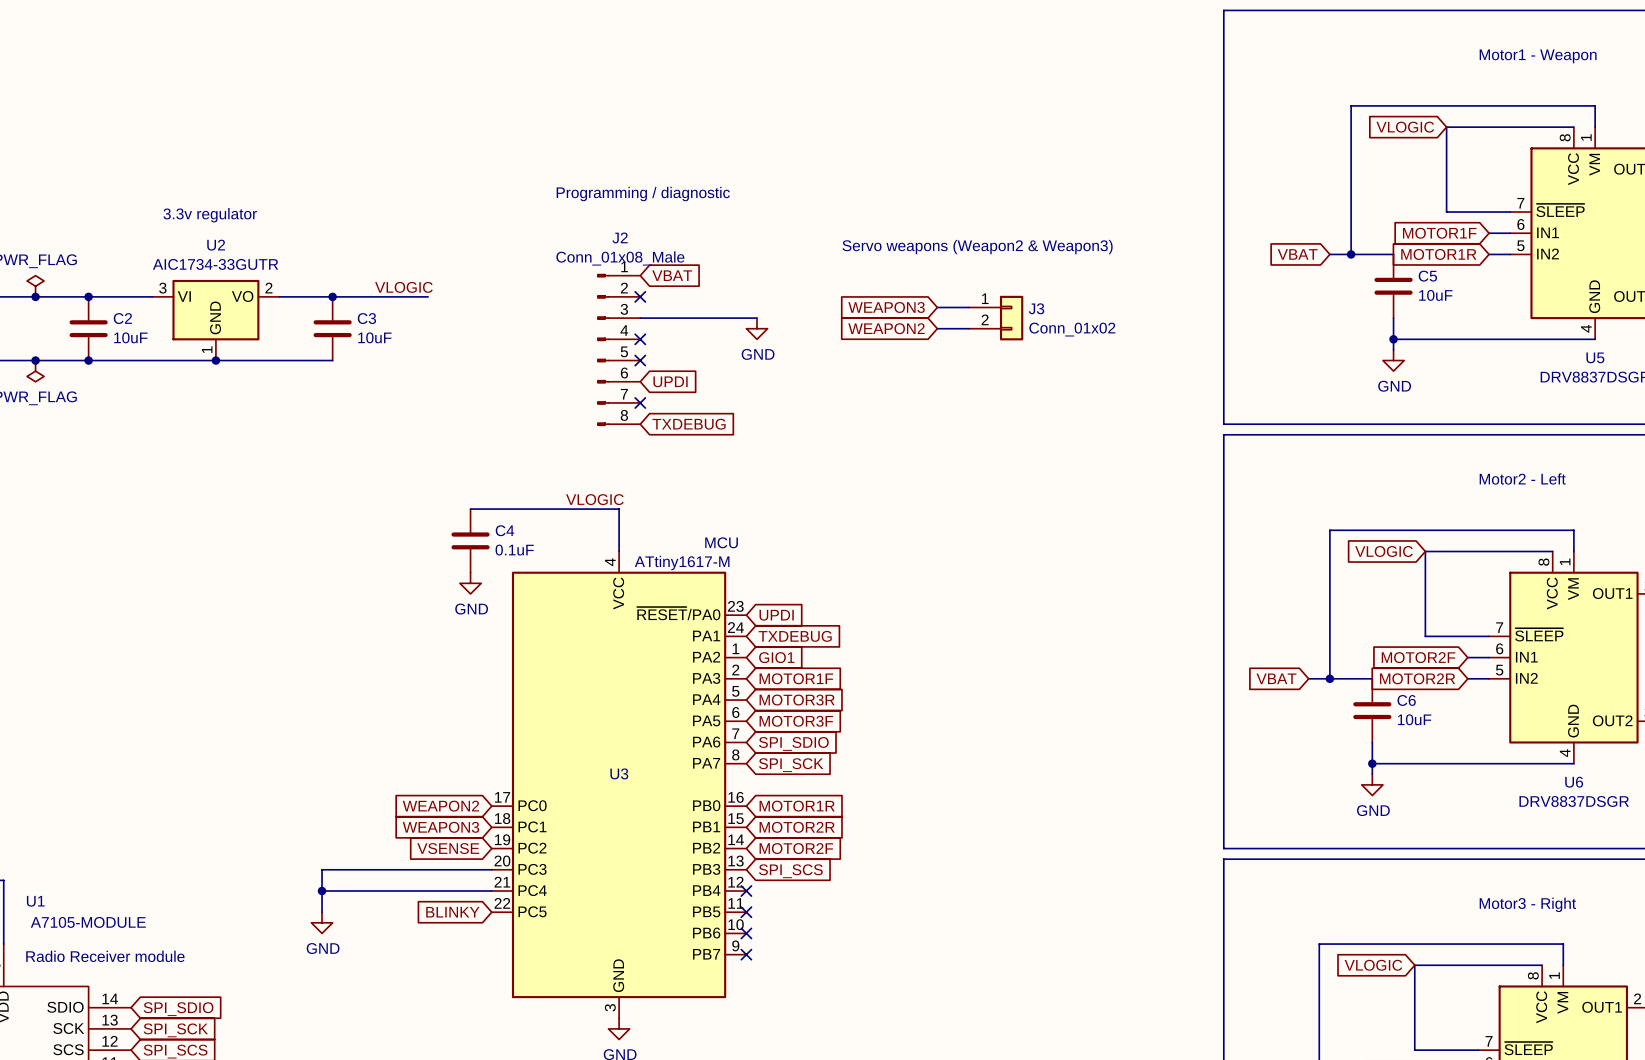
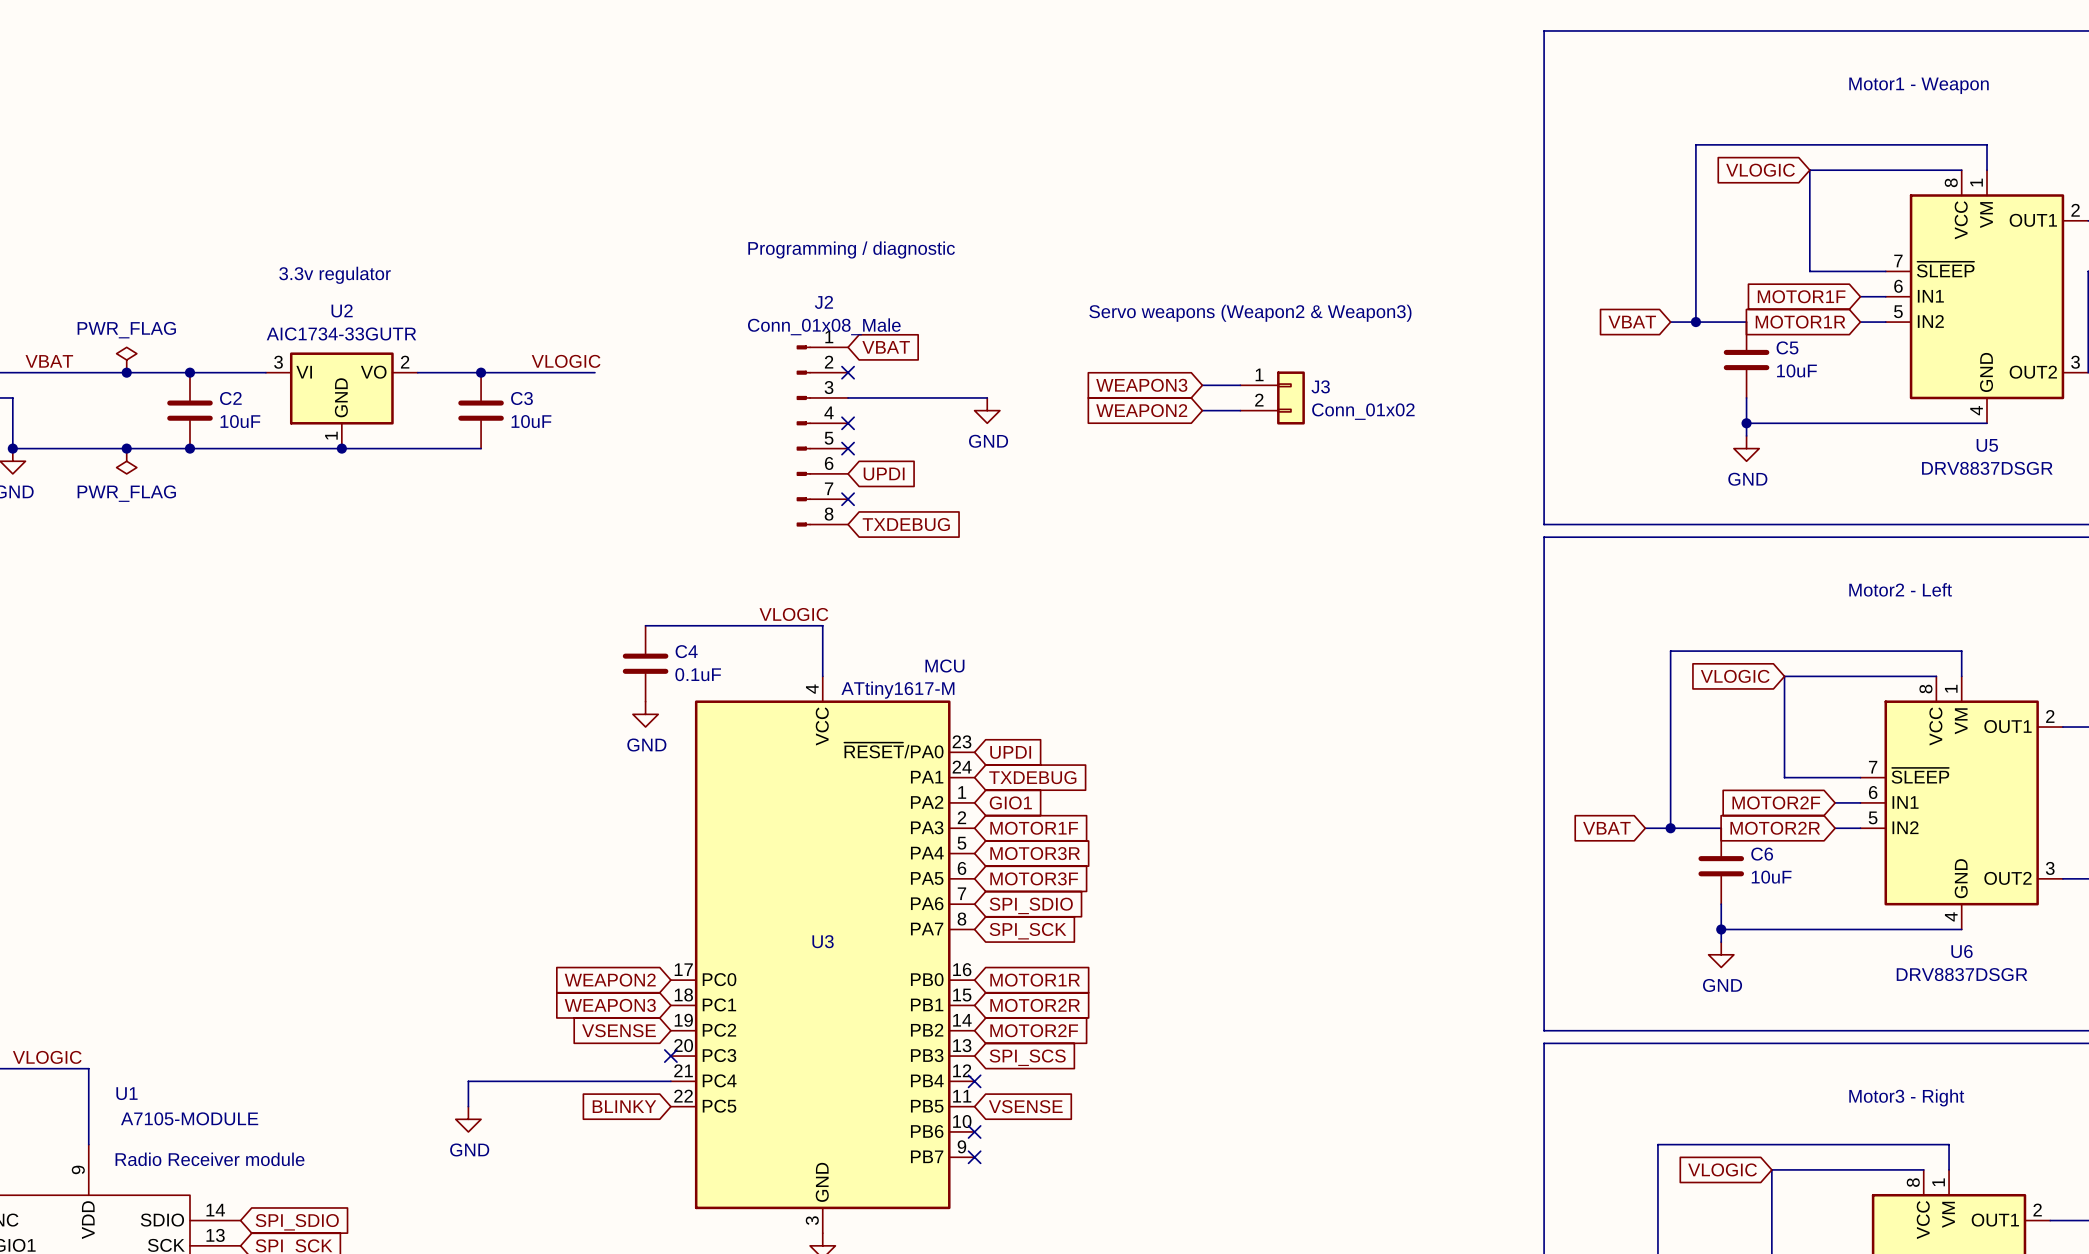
wire: (491, 869) (322, 869) (322, 891) -> none
no-connect mark: none -> (670, 1056)
junction: (322, 891) -> none
no-connect mark: (746, 912) -> none
global label: none -> VSENSE (1025, 1106)

